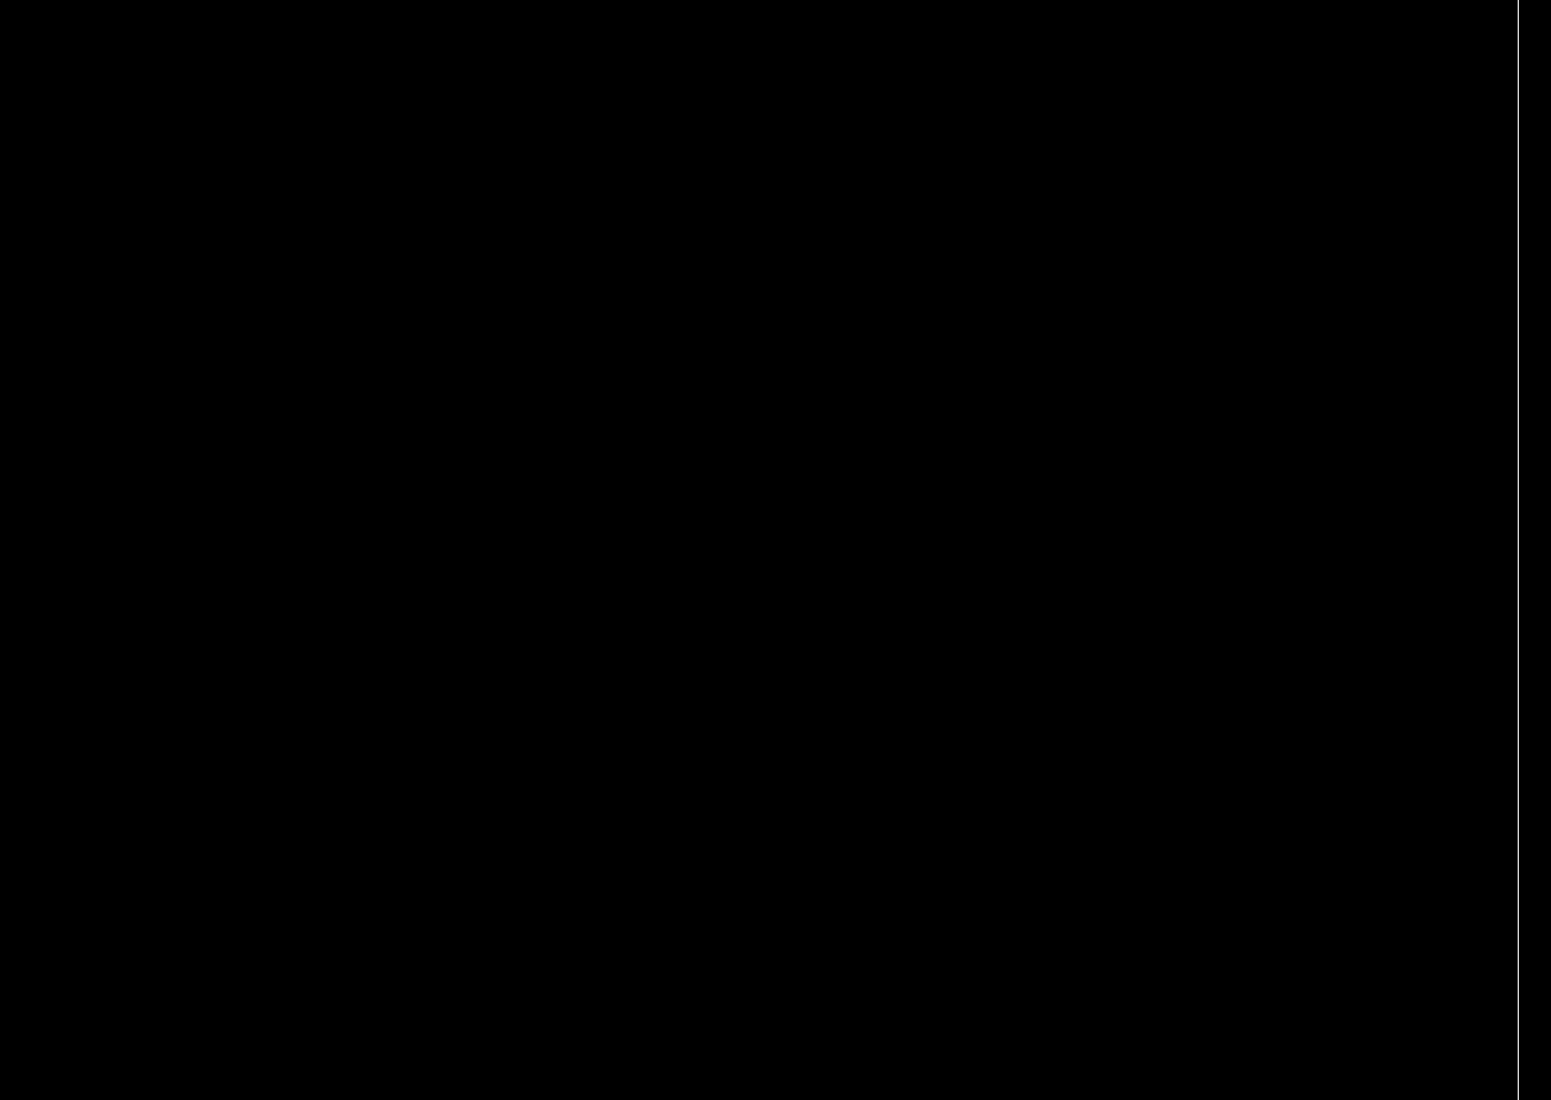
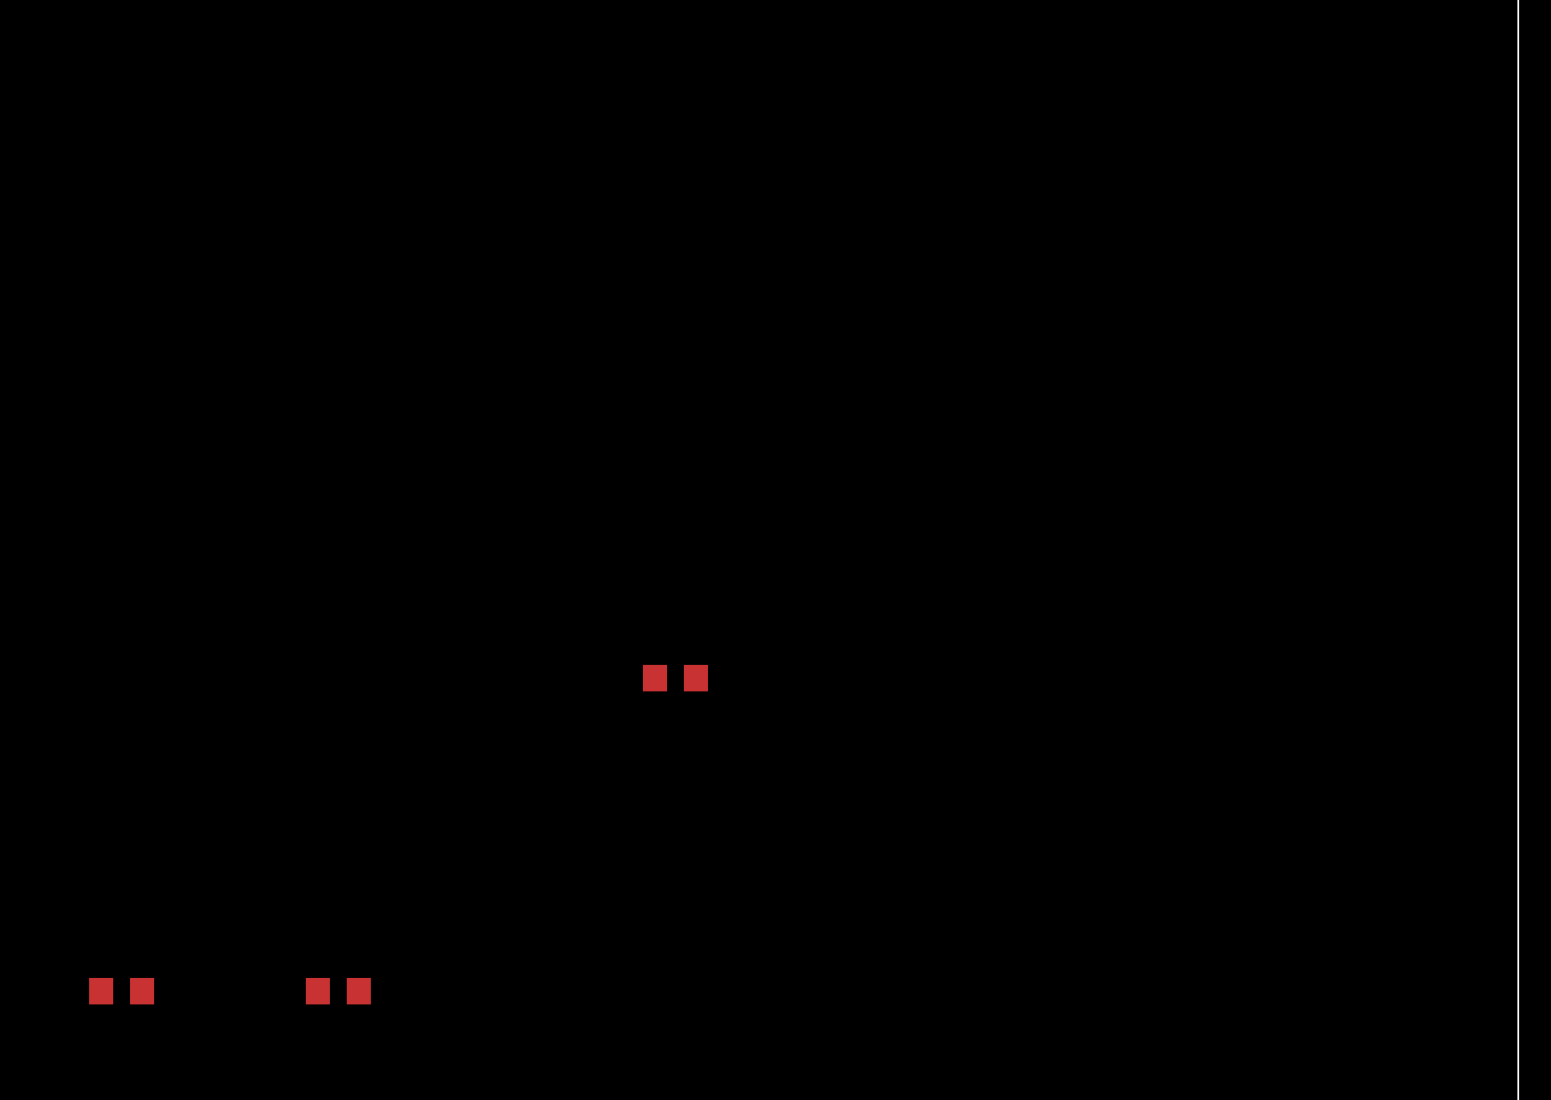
part: none -> (675, 678)
part: none -> (121, 991)
part: none -> (338, 991)

